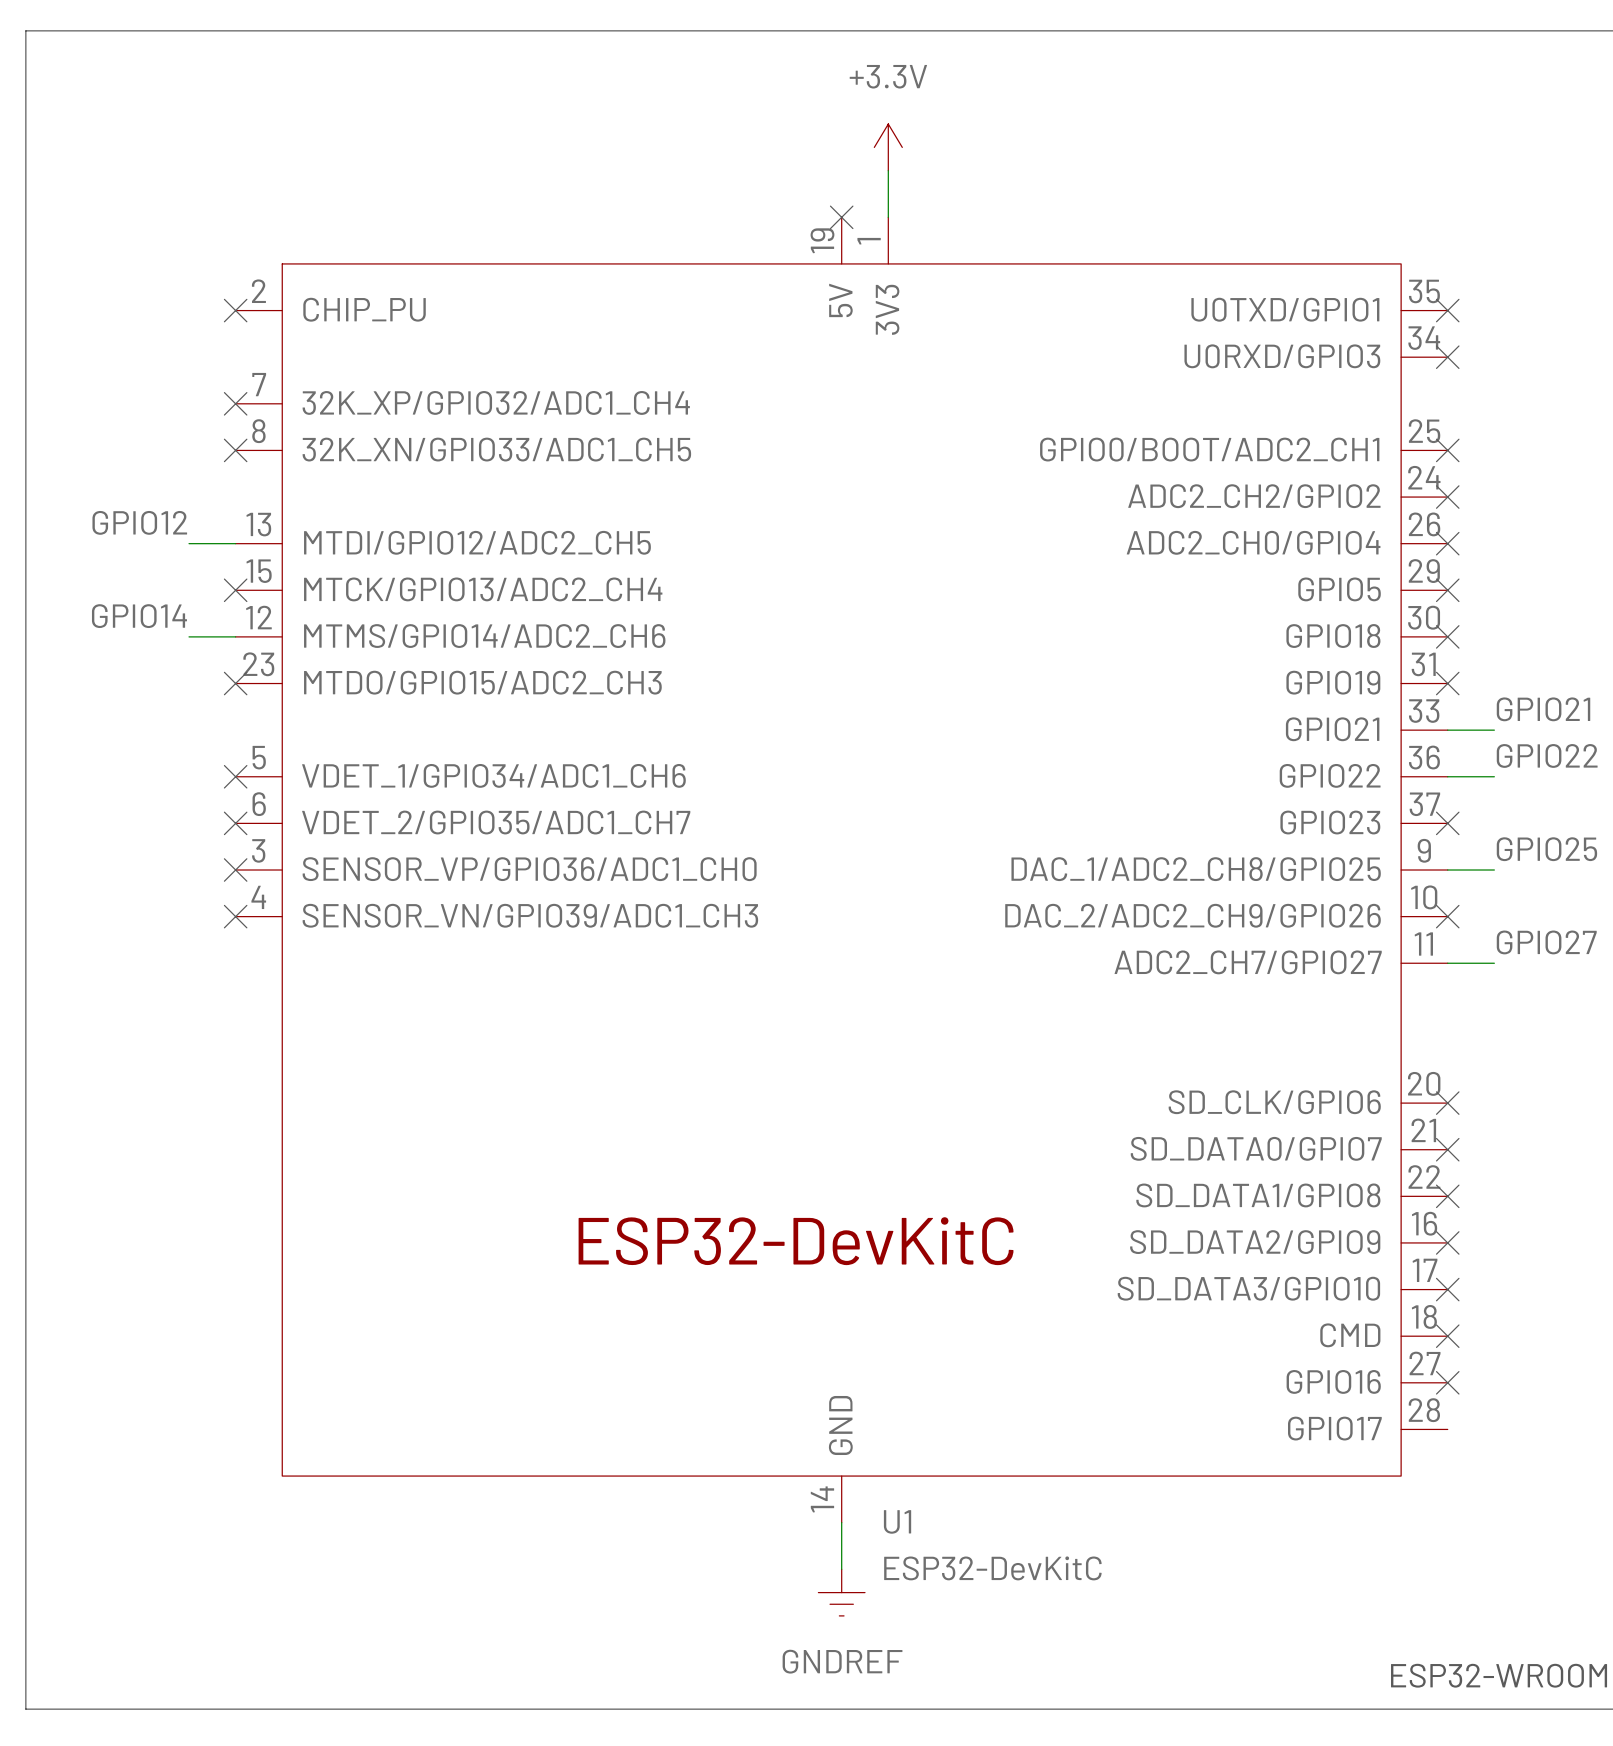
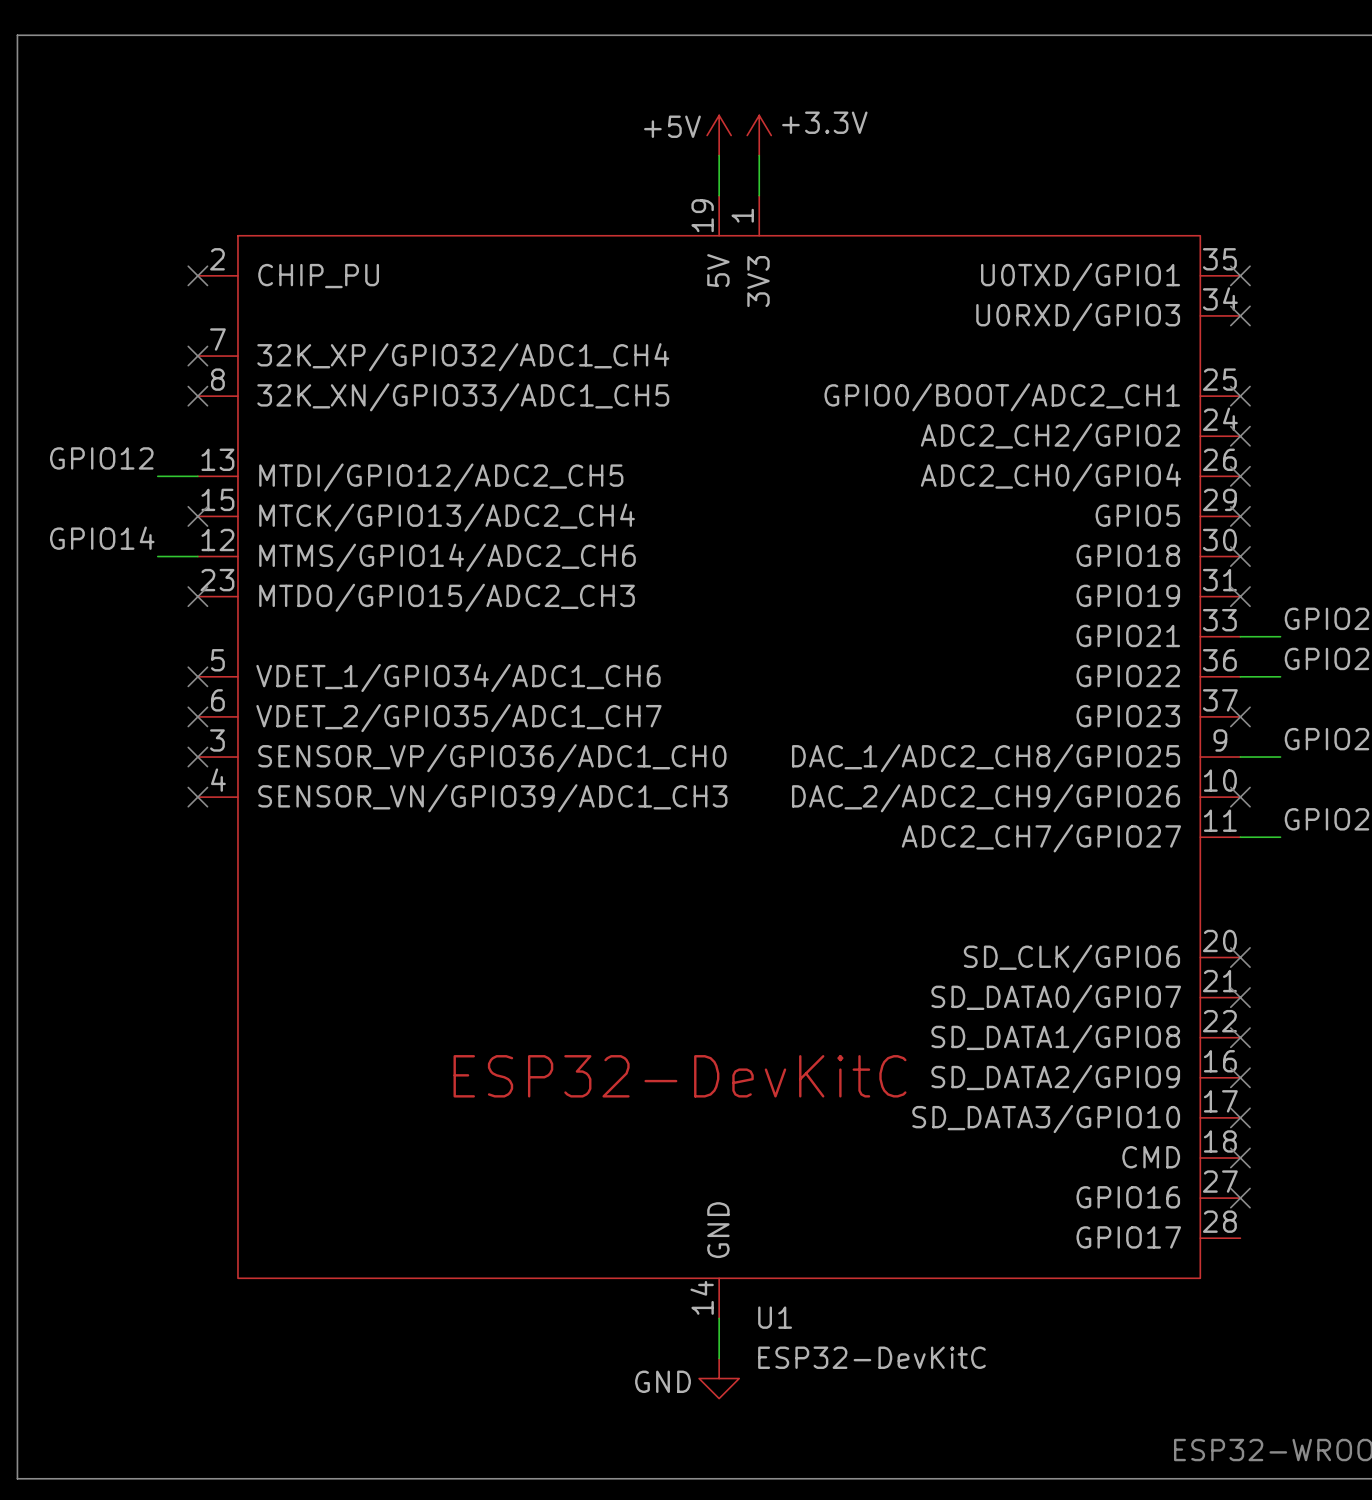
power symbol text position: +3.3V (888, 76) -> +3.3V (824, 122)
power symbol: none -> +5V (719, 135)
wire: none -> (719, 155) (719, 195)
no-connect mark: (841, 217) -> none
power symbol: GNDREF (841, 1592) -> GND (719, 1378)

